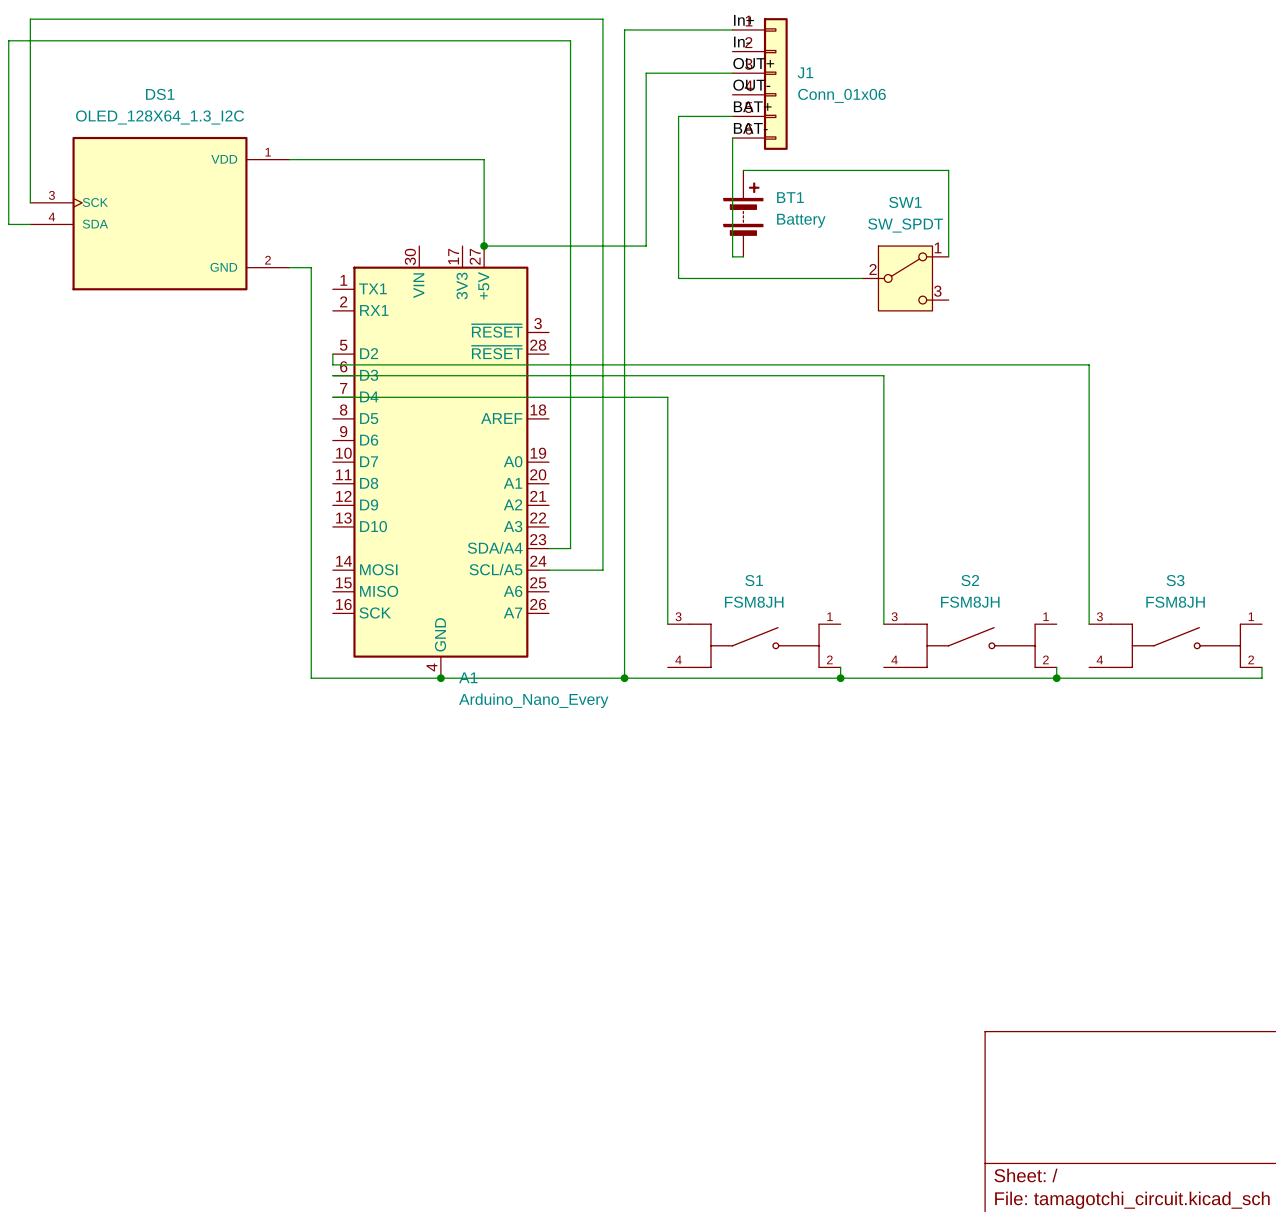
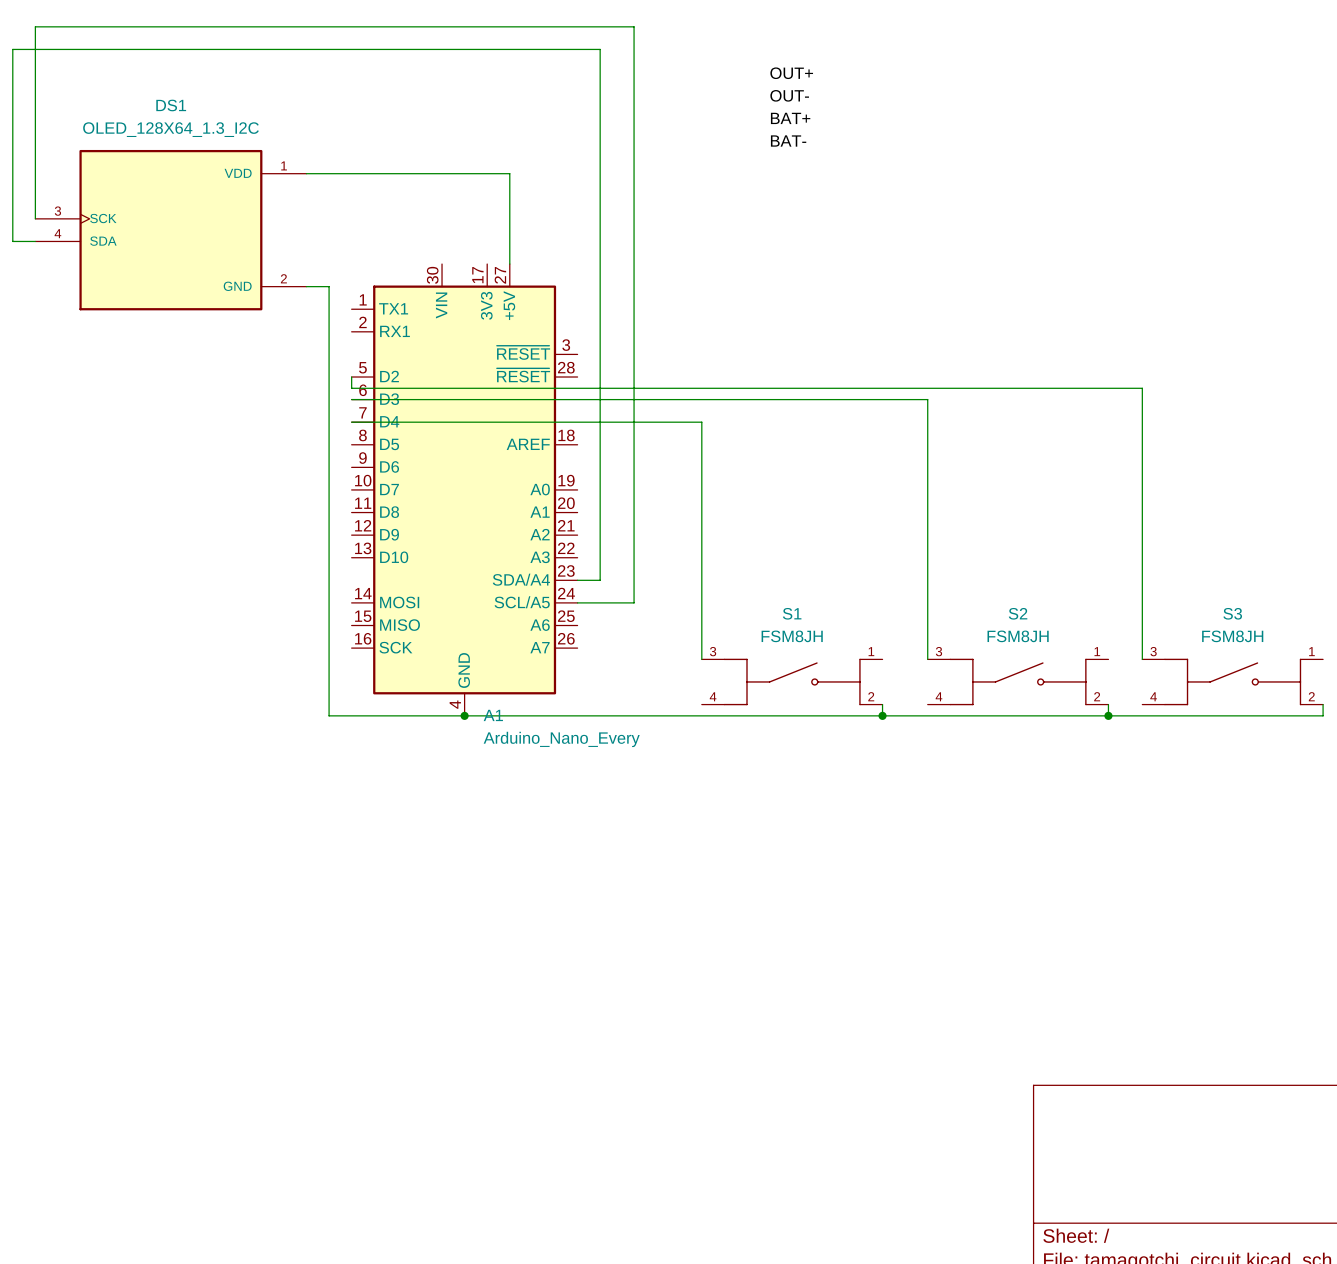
label: In+ (744, 20) -> none
wire: (732, 29) (624, 29) (624, 678) -> none
label: In- (742, 41) -> none
wire: (732, 73) (646, 73) (646, 246) (484, 246) -> none
J1: Conn_01x06 (760, 84) -> none
wire: (732, 116) (678, 116) (678, 278) (862, 278) -> none
wire: (732, 138) (732, 256) (743, 256) -> none
wire: (743, 170) (948, 170) (948, 256) -> none
BT1: Battery (743, 213) -> none
junction: (484, 246) -> none
SW1: SW_SPDT (905, 278) -> none
junction: (624, 678) -> none

